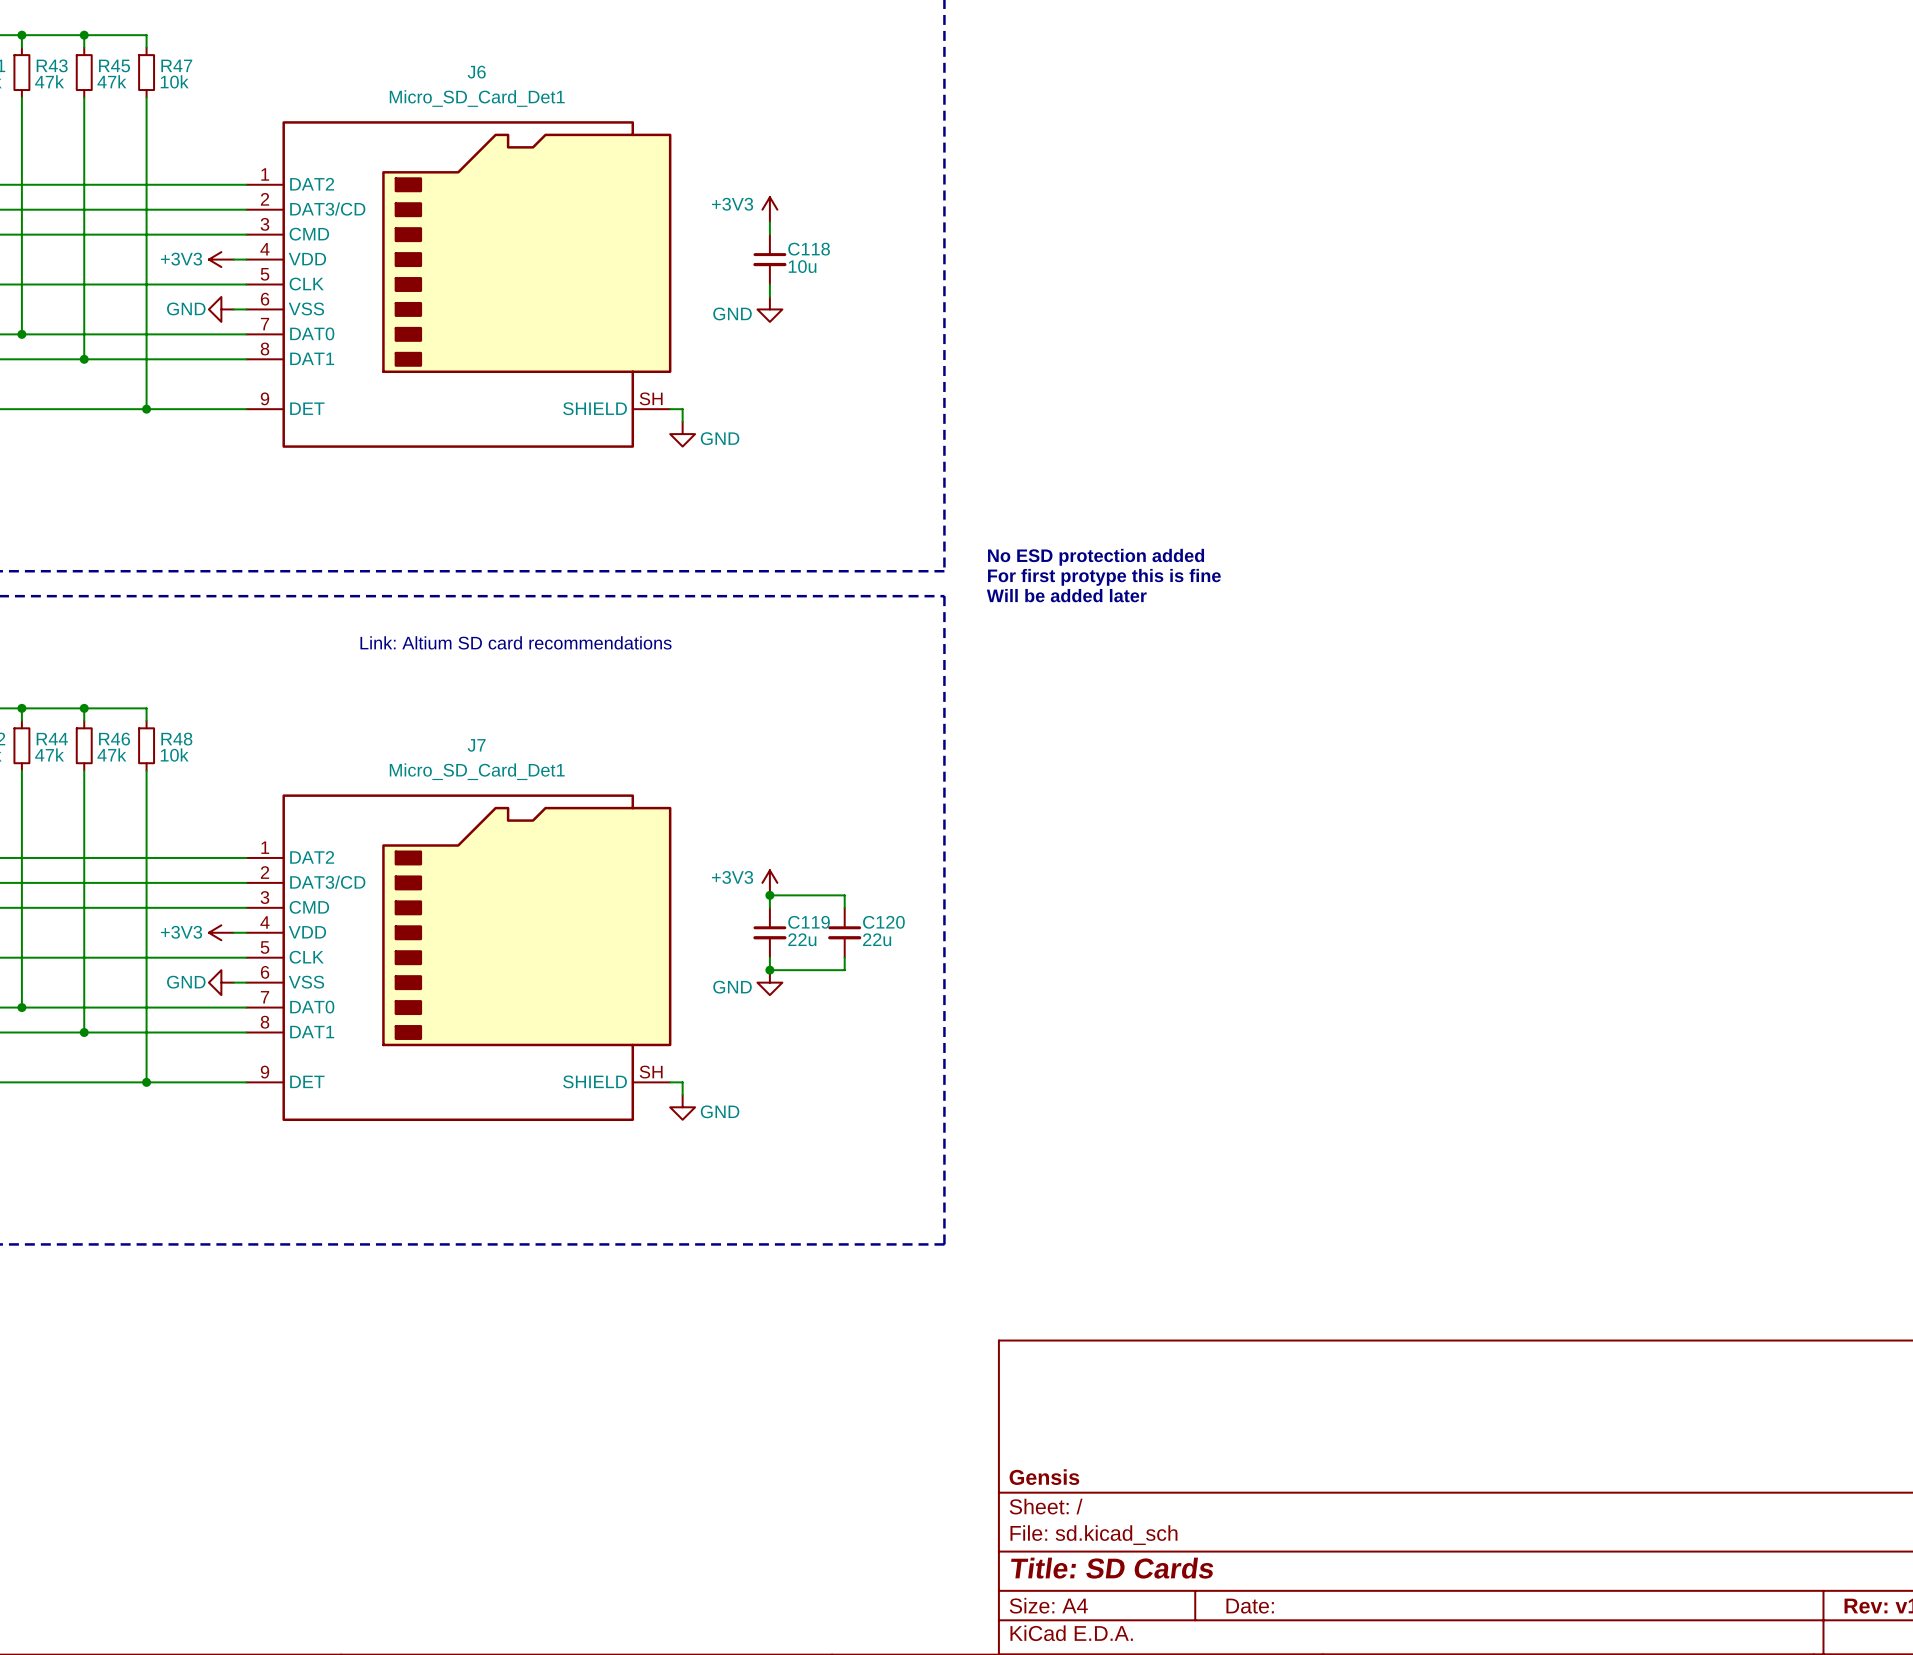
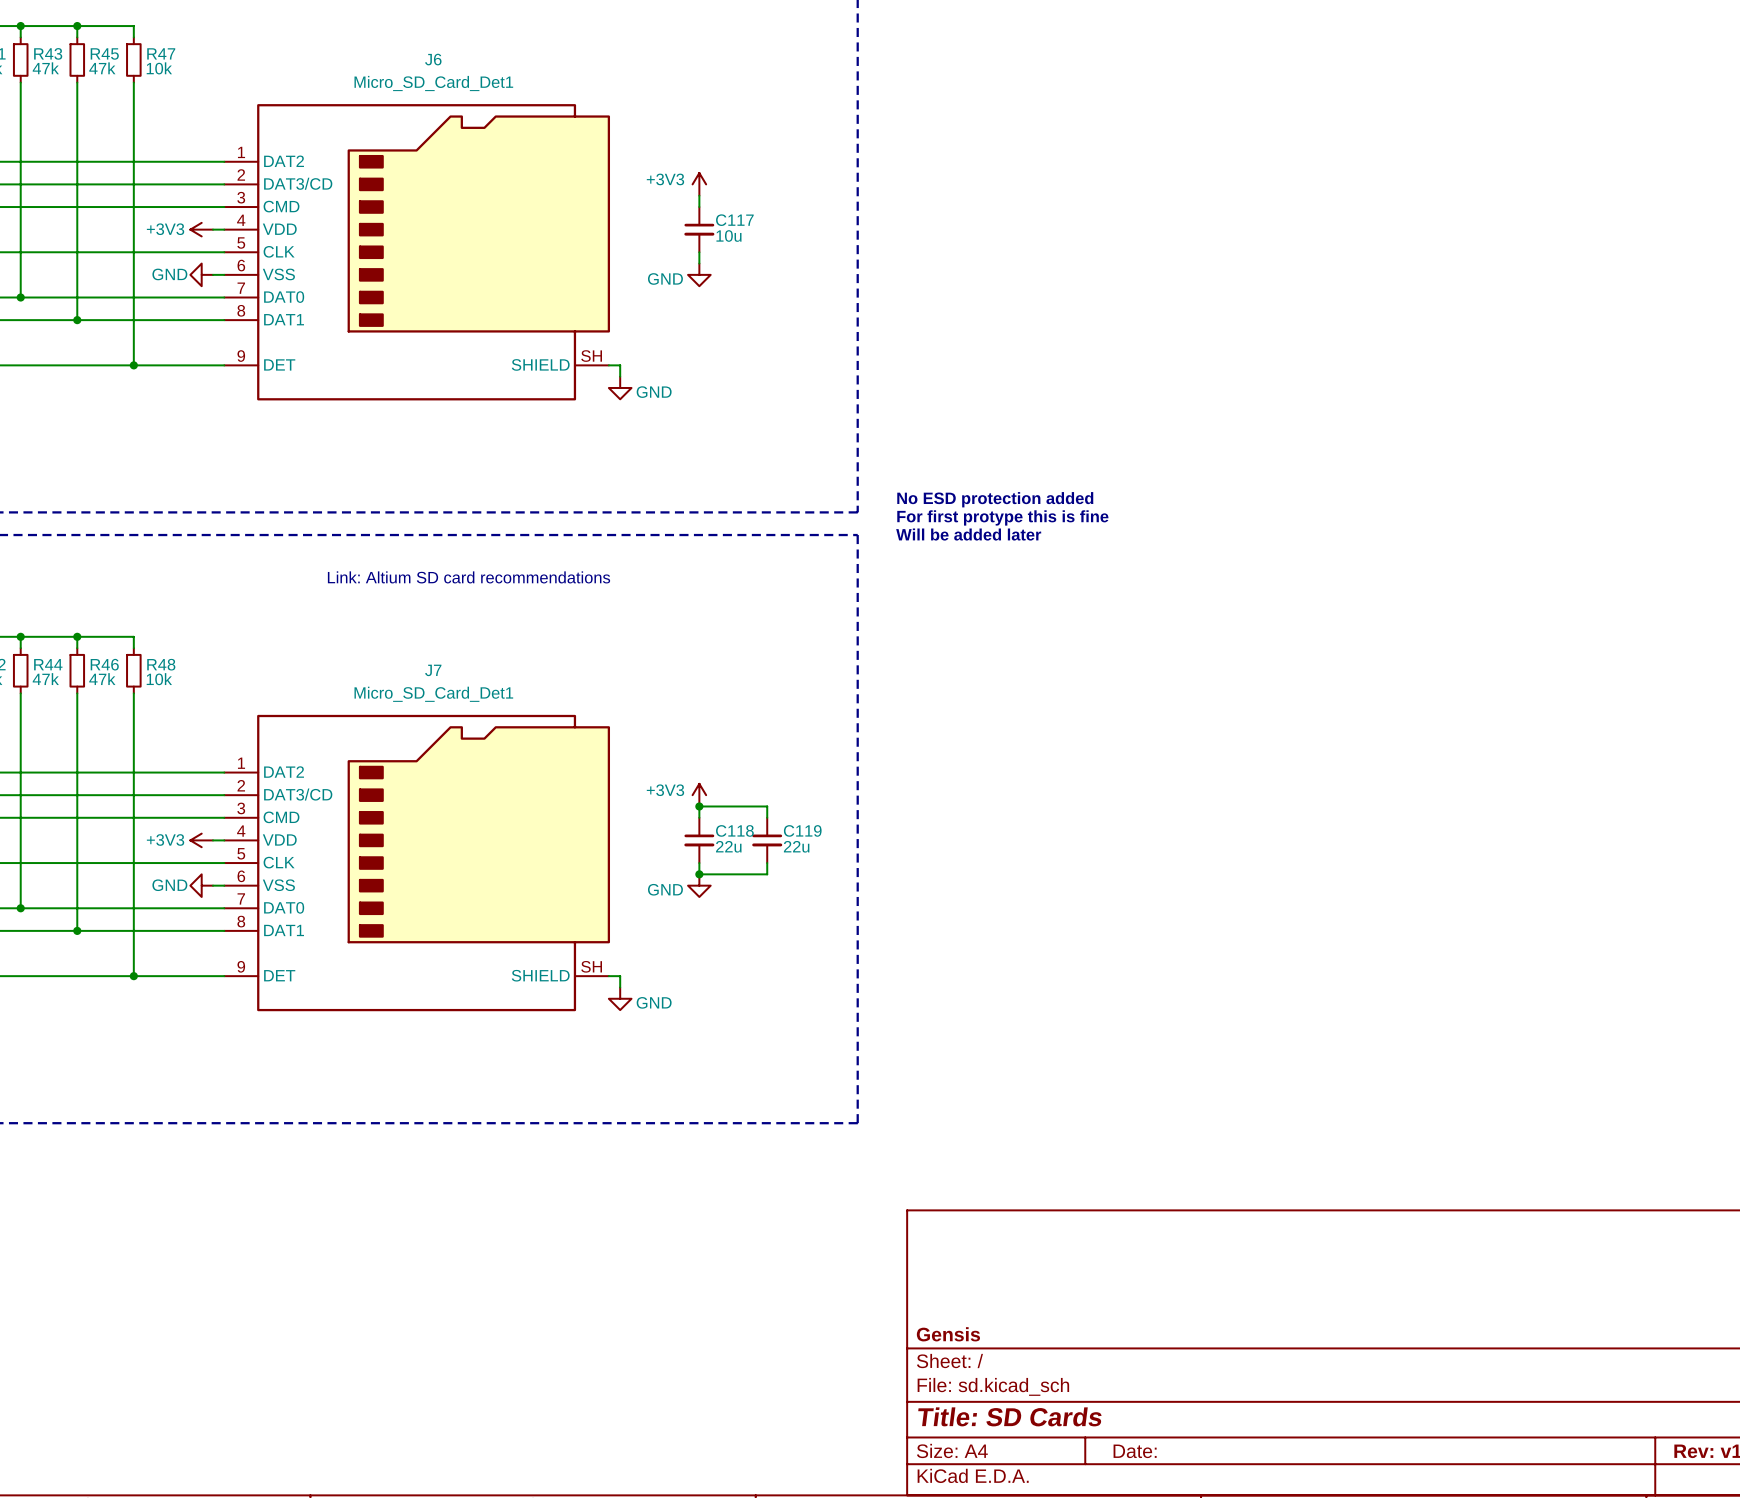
C118 name: C118 (809, 249) -> C117 (734, 220)
C119 name: C119 (809, 922) -> C118 (734, 830)
C120 name: C120 (883, 922) -> C119 (802, 830)

